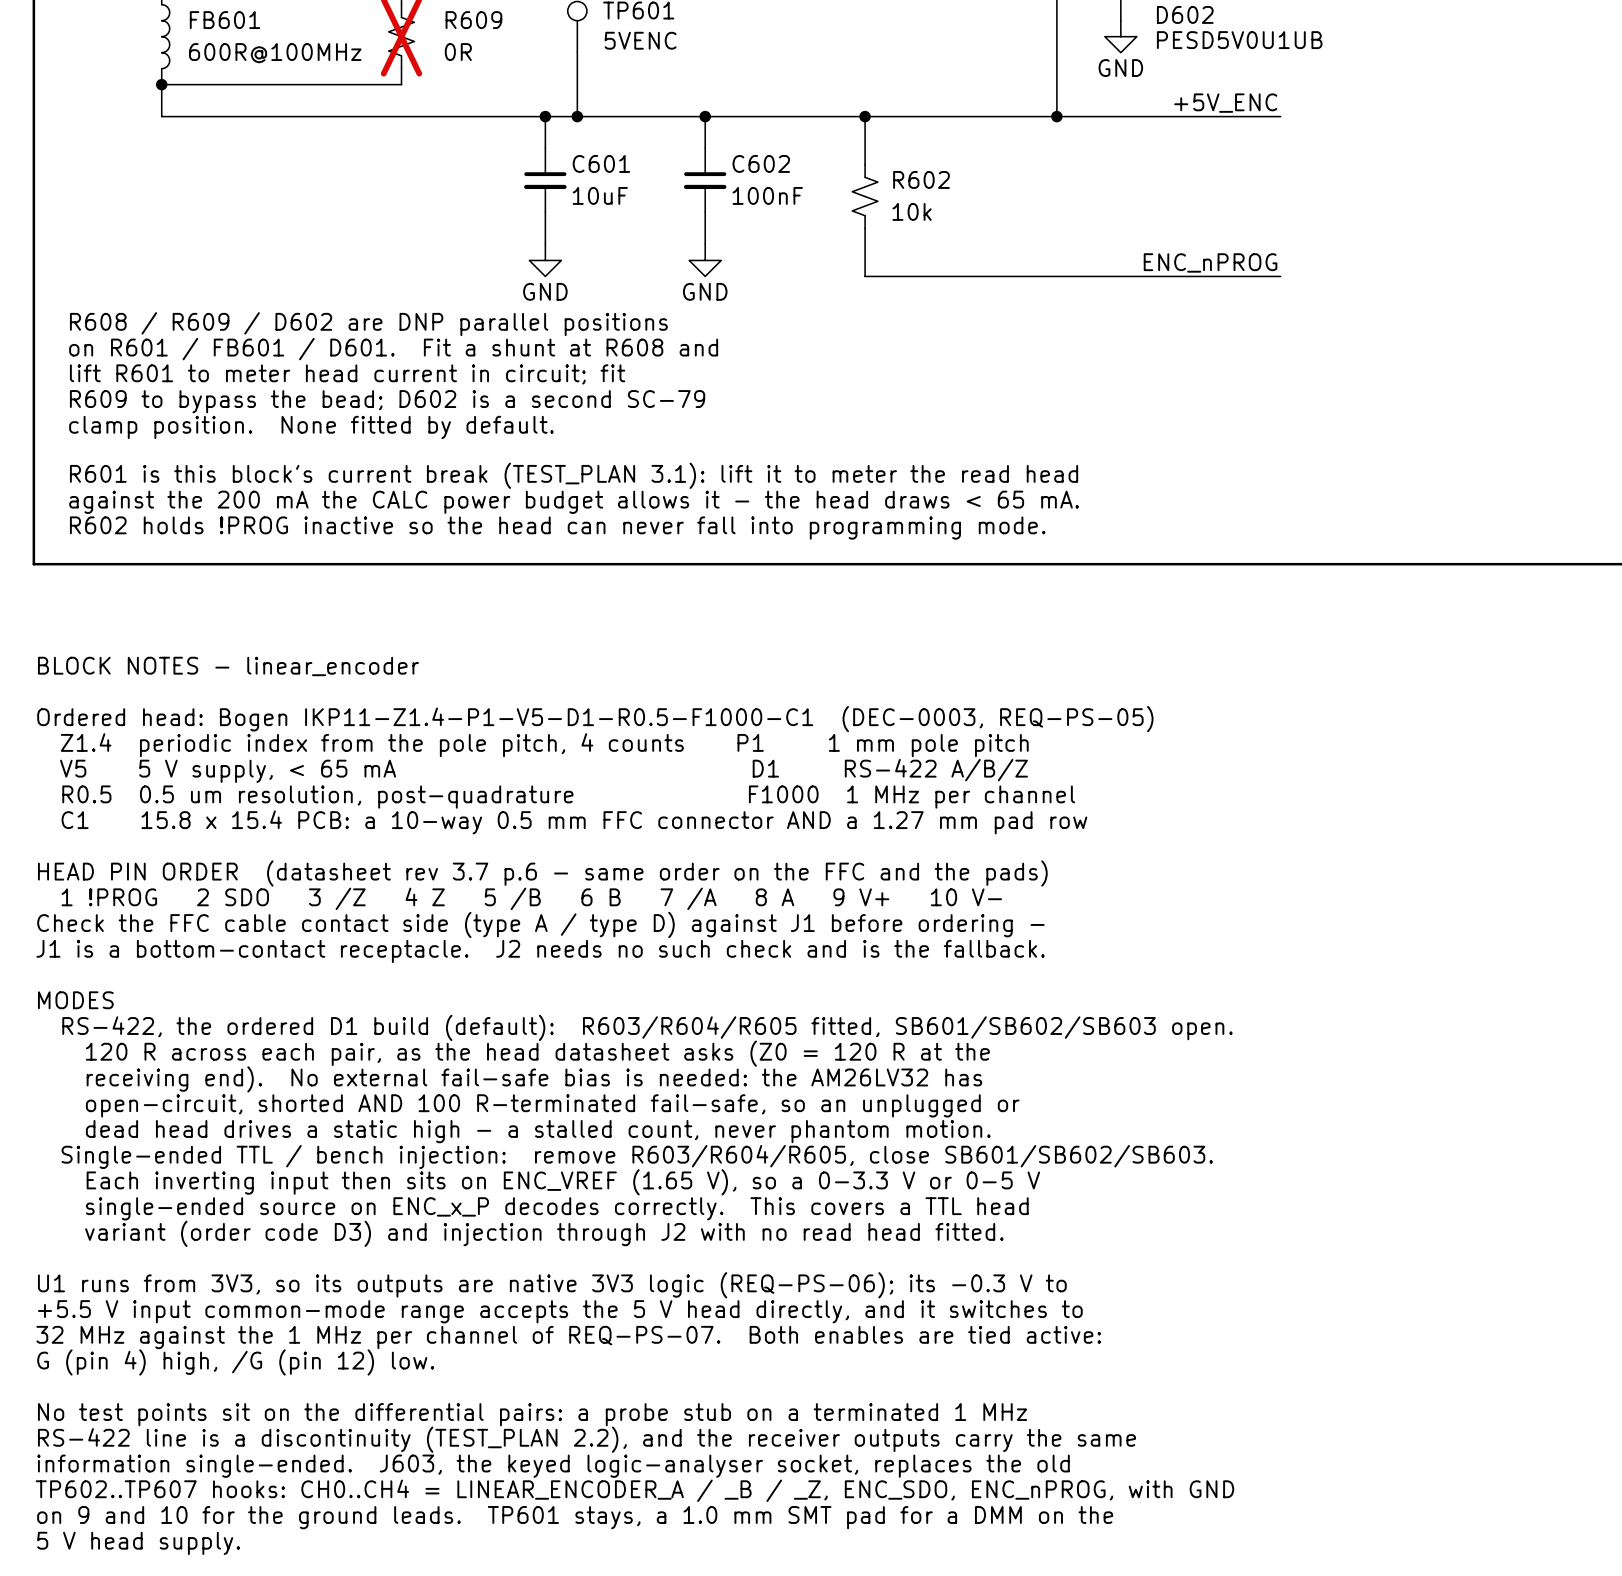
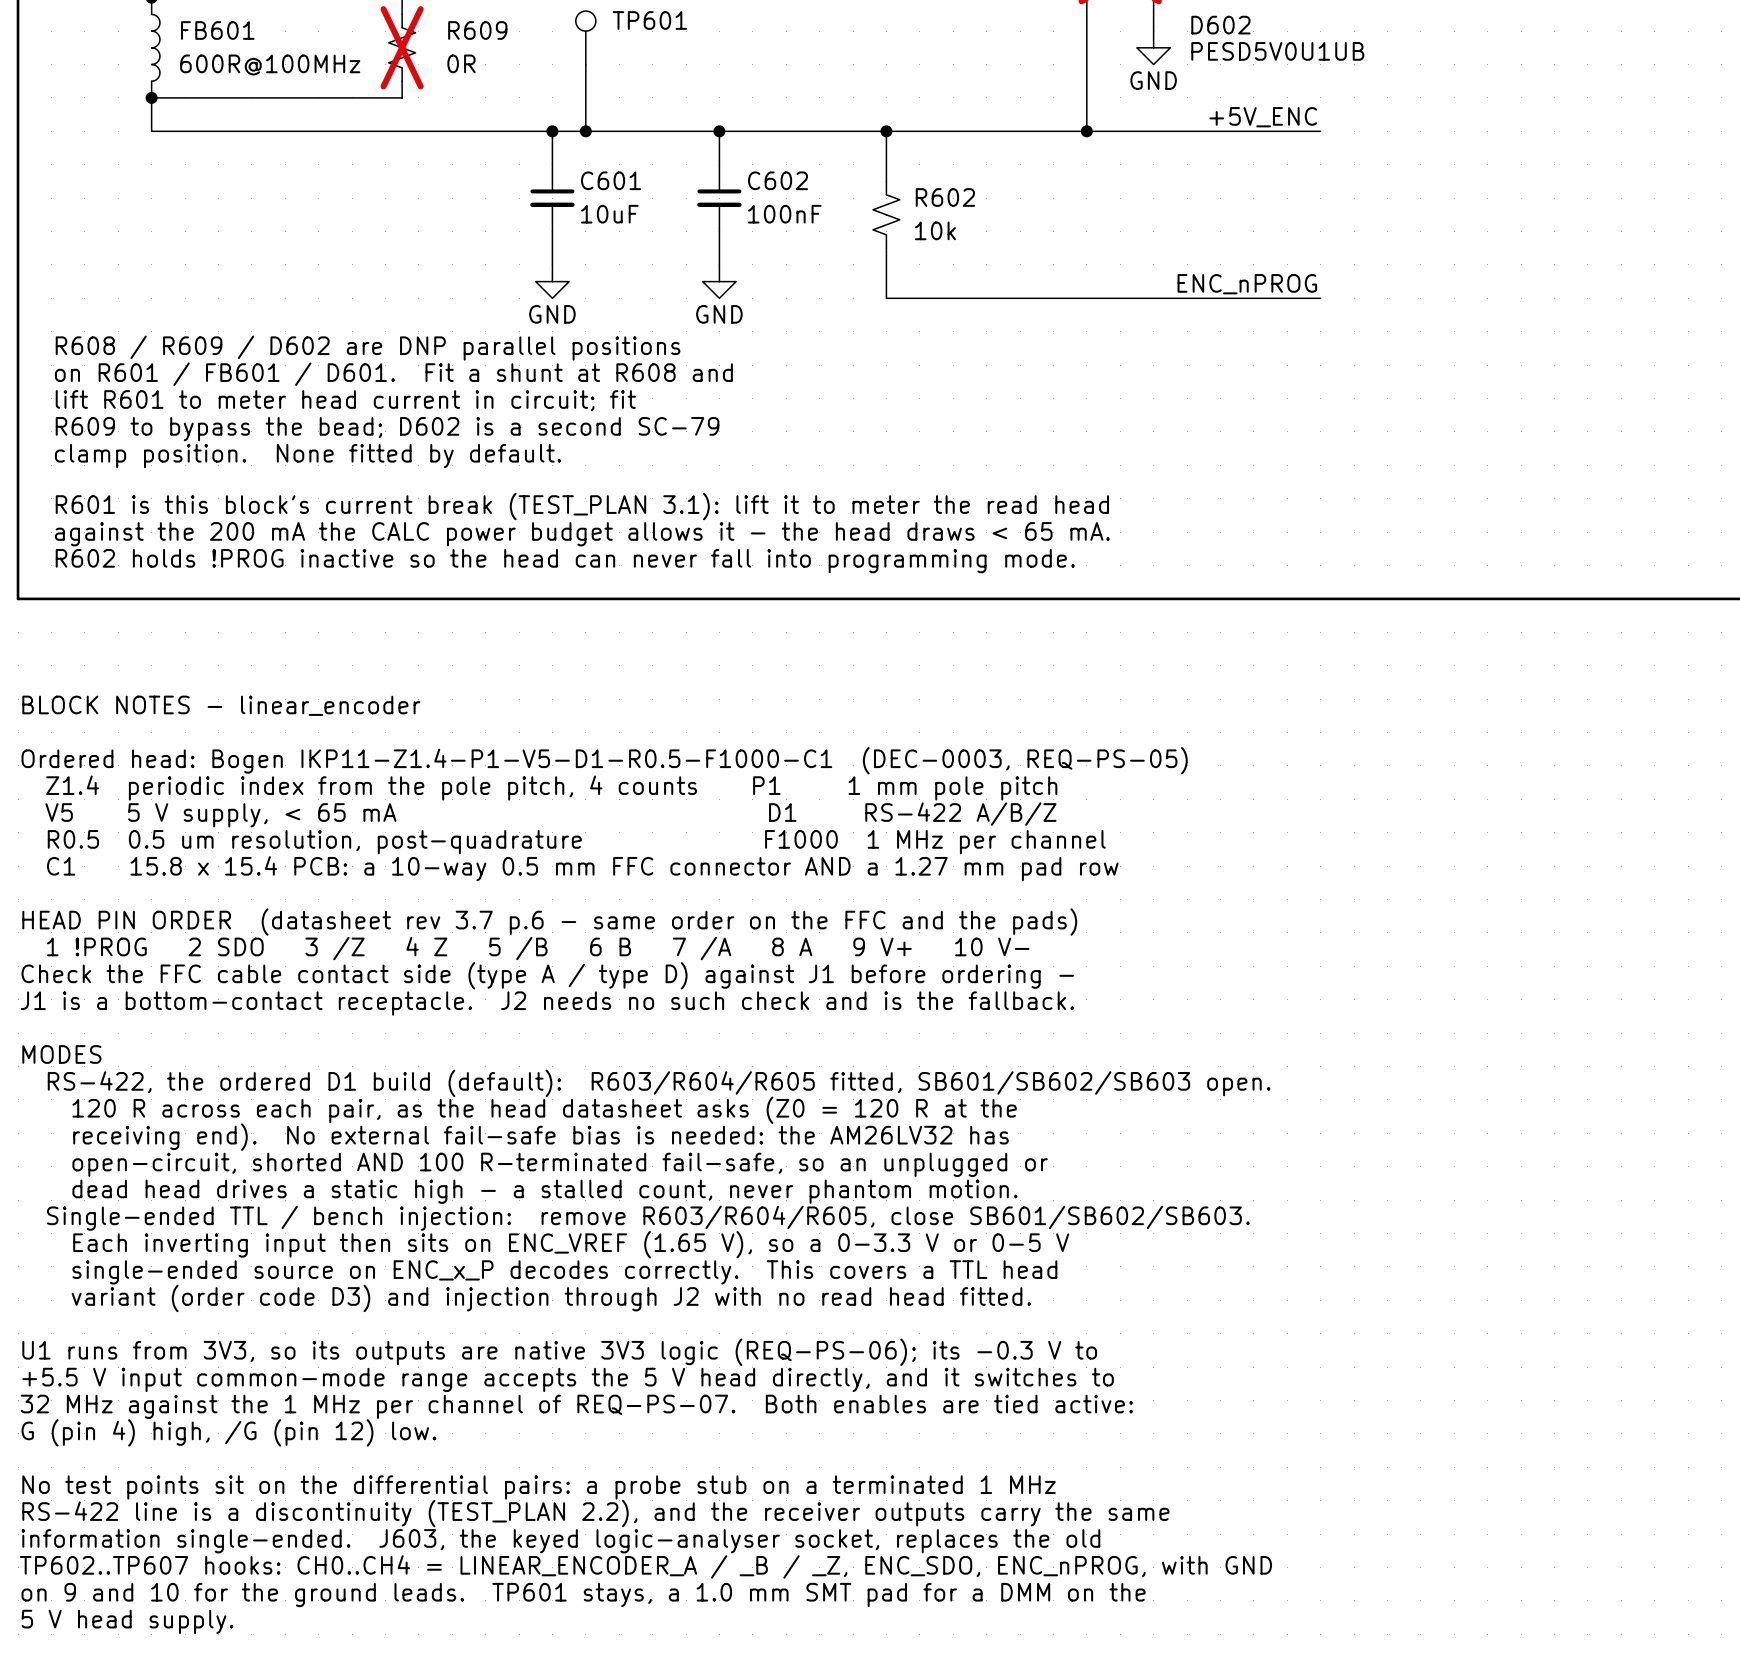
TP601 value: 5VENC (640, 40) -> none

